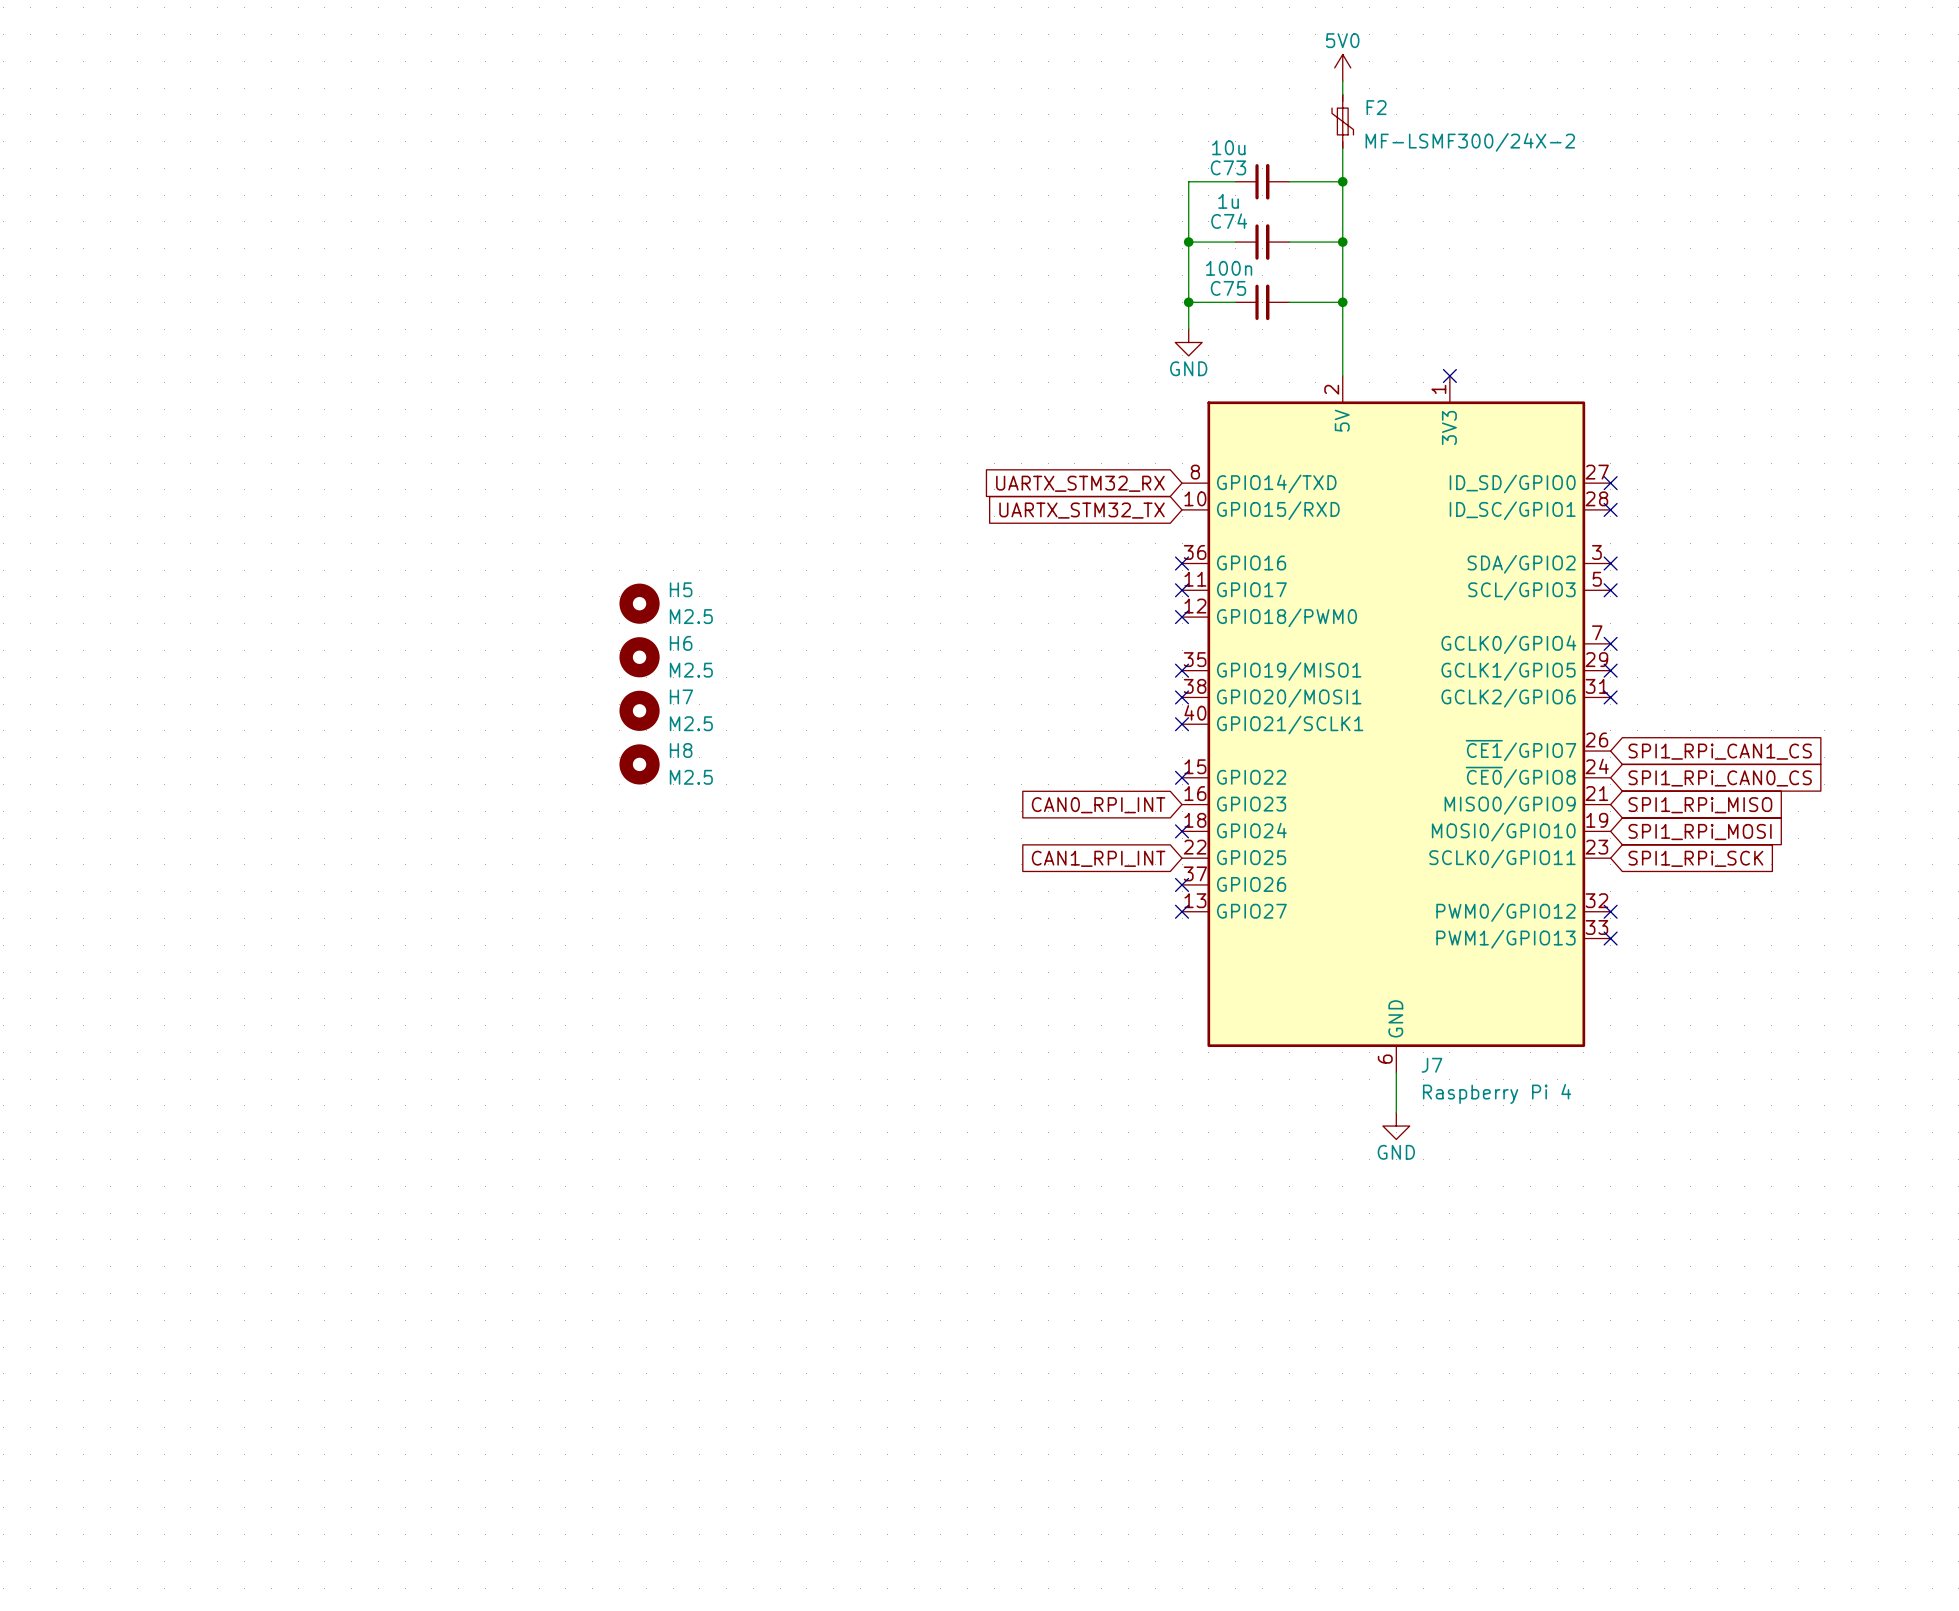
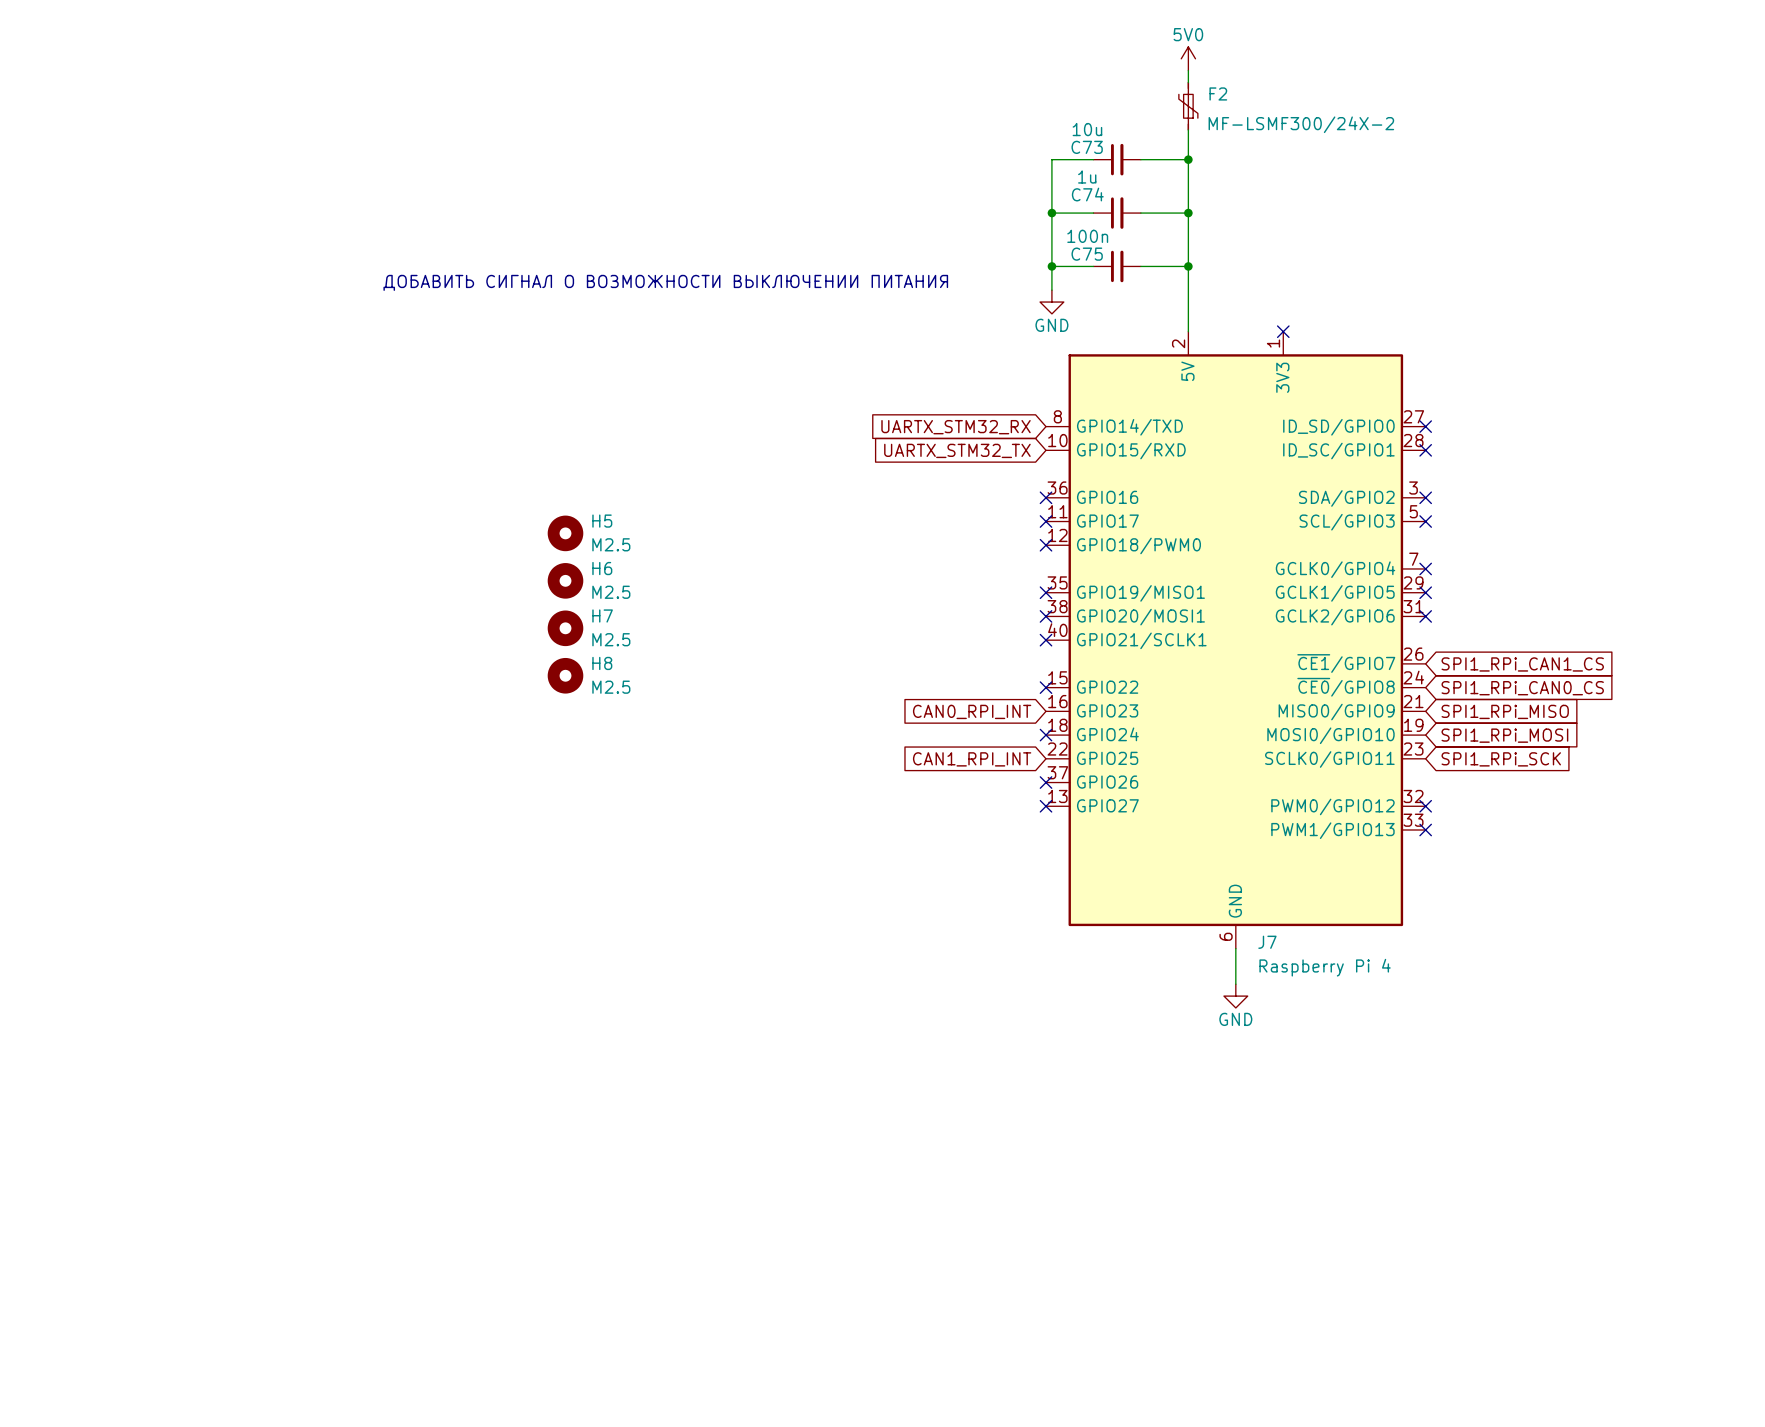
text: none -> ДОБАВИТЬ СИГНАЛ О ВОЗМОЖНОСТИ ВЫКЛЮЧЕНИИ ПИТАНИЯ (665, 282)

